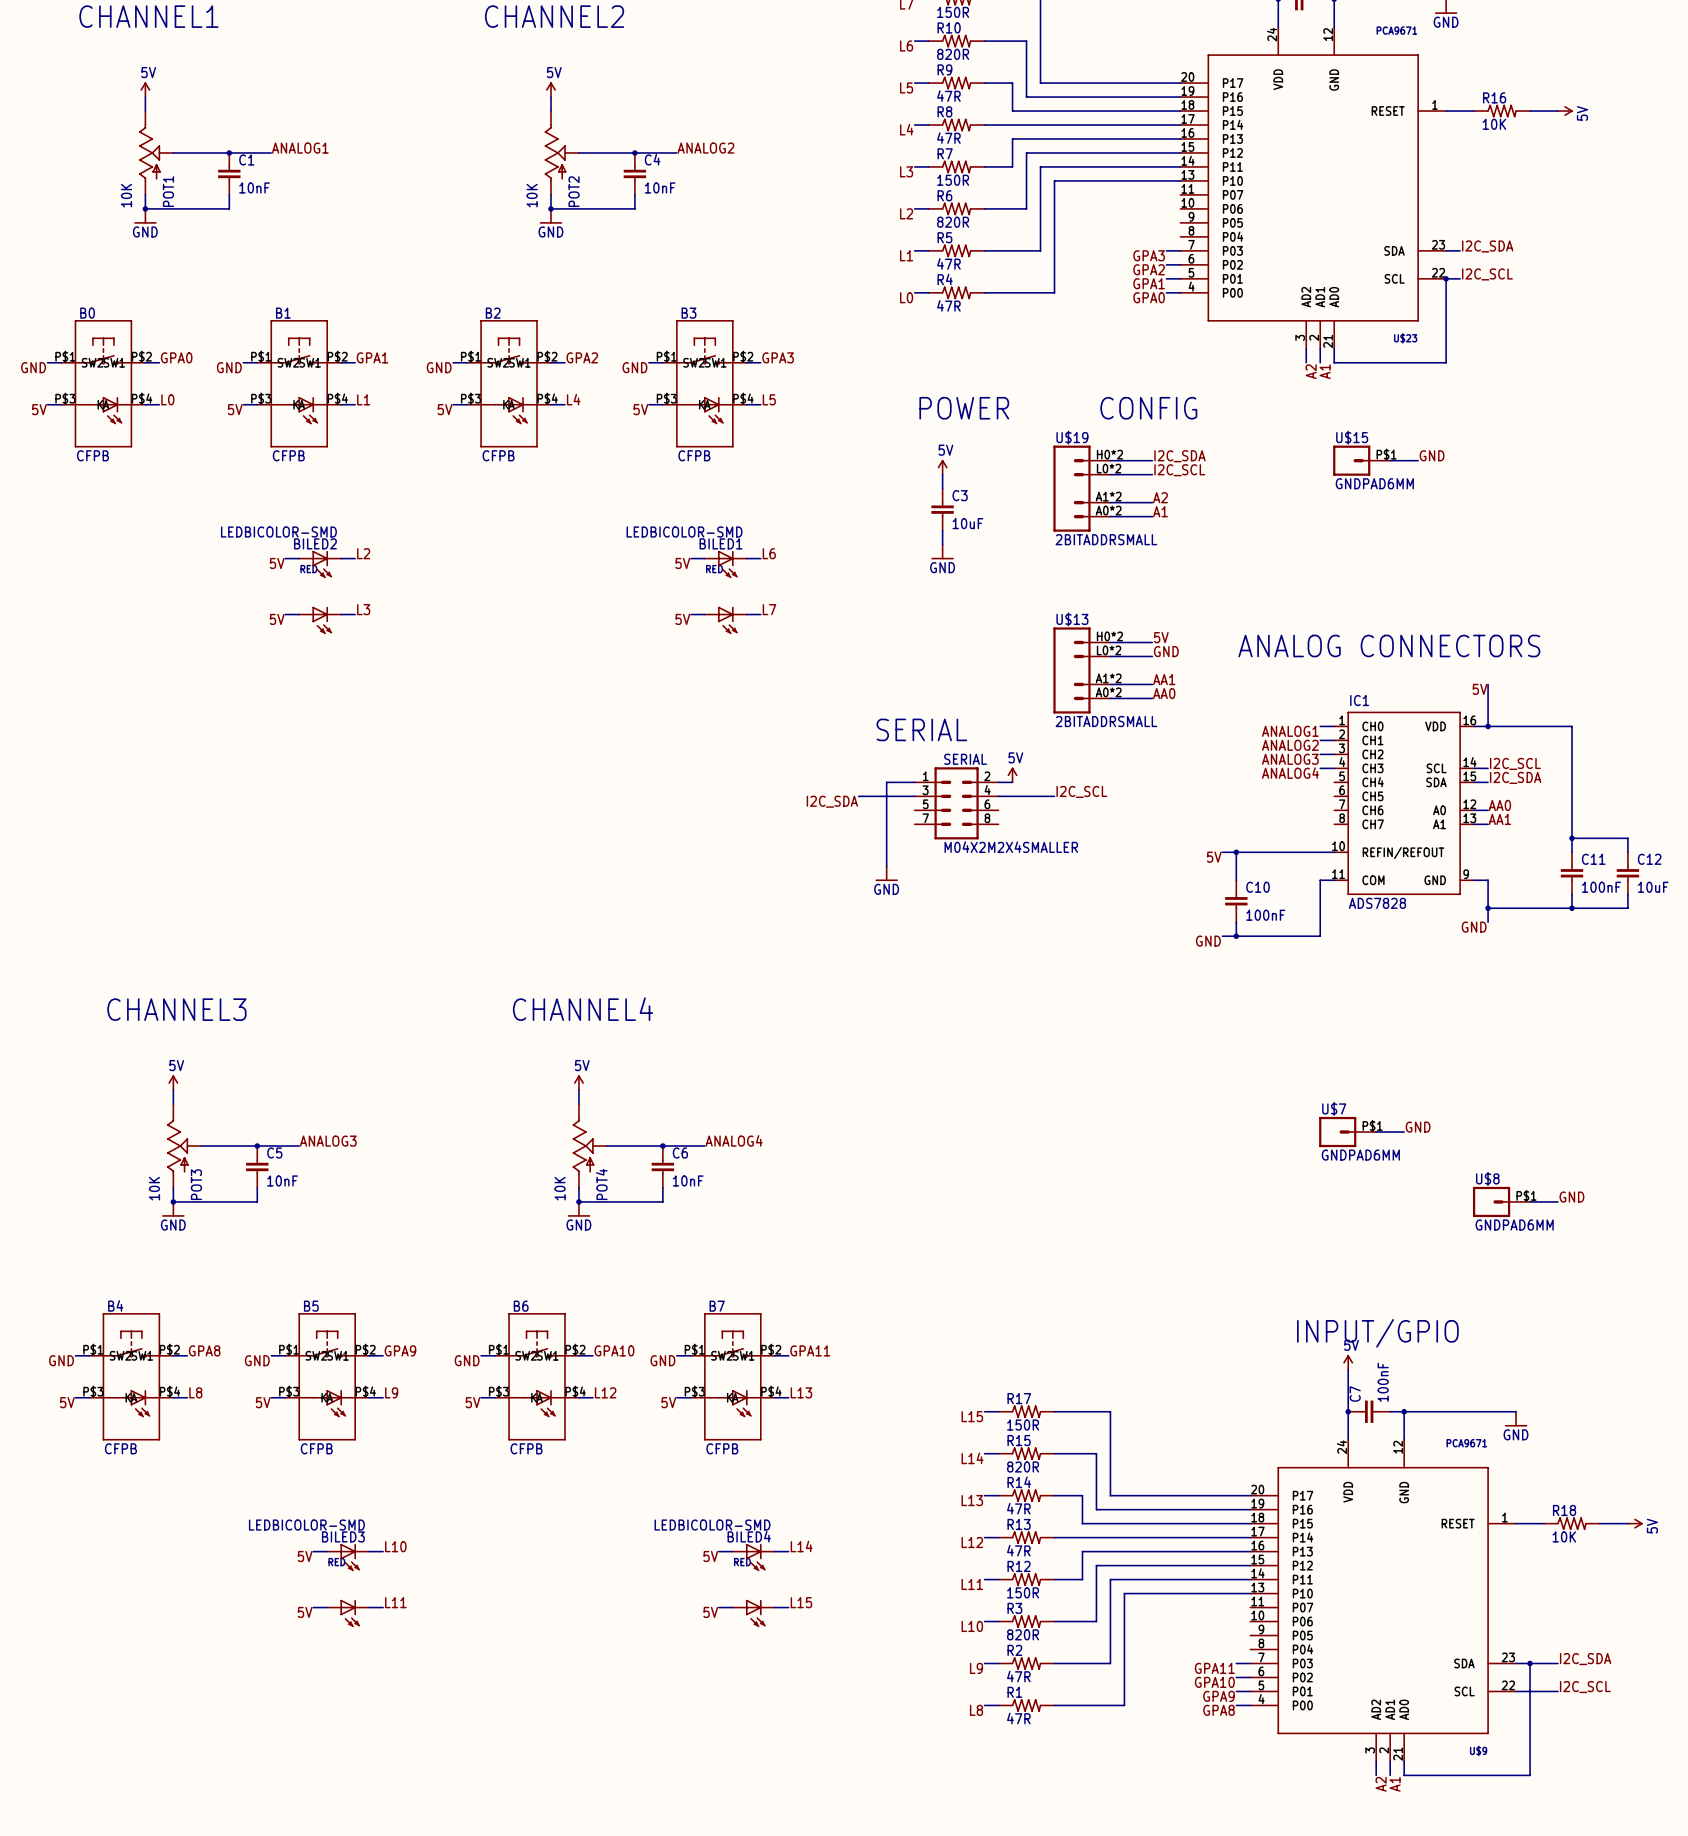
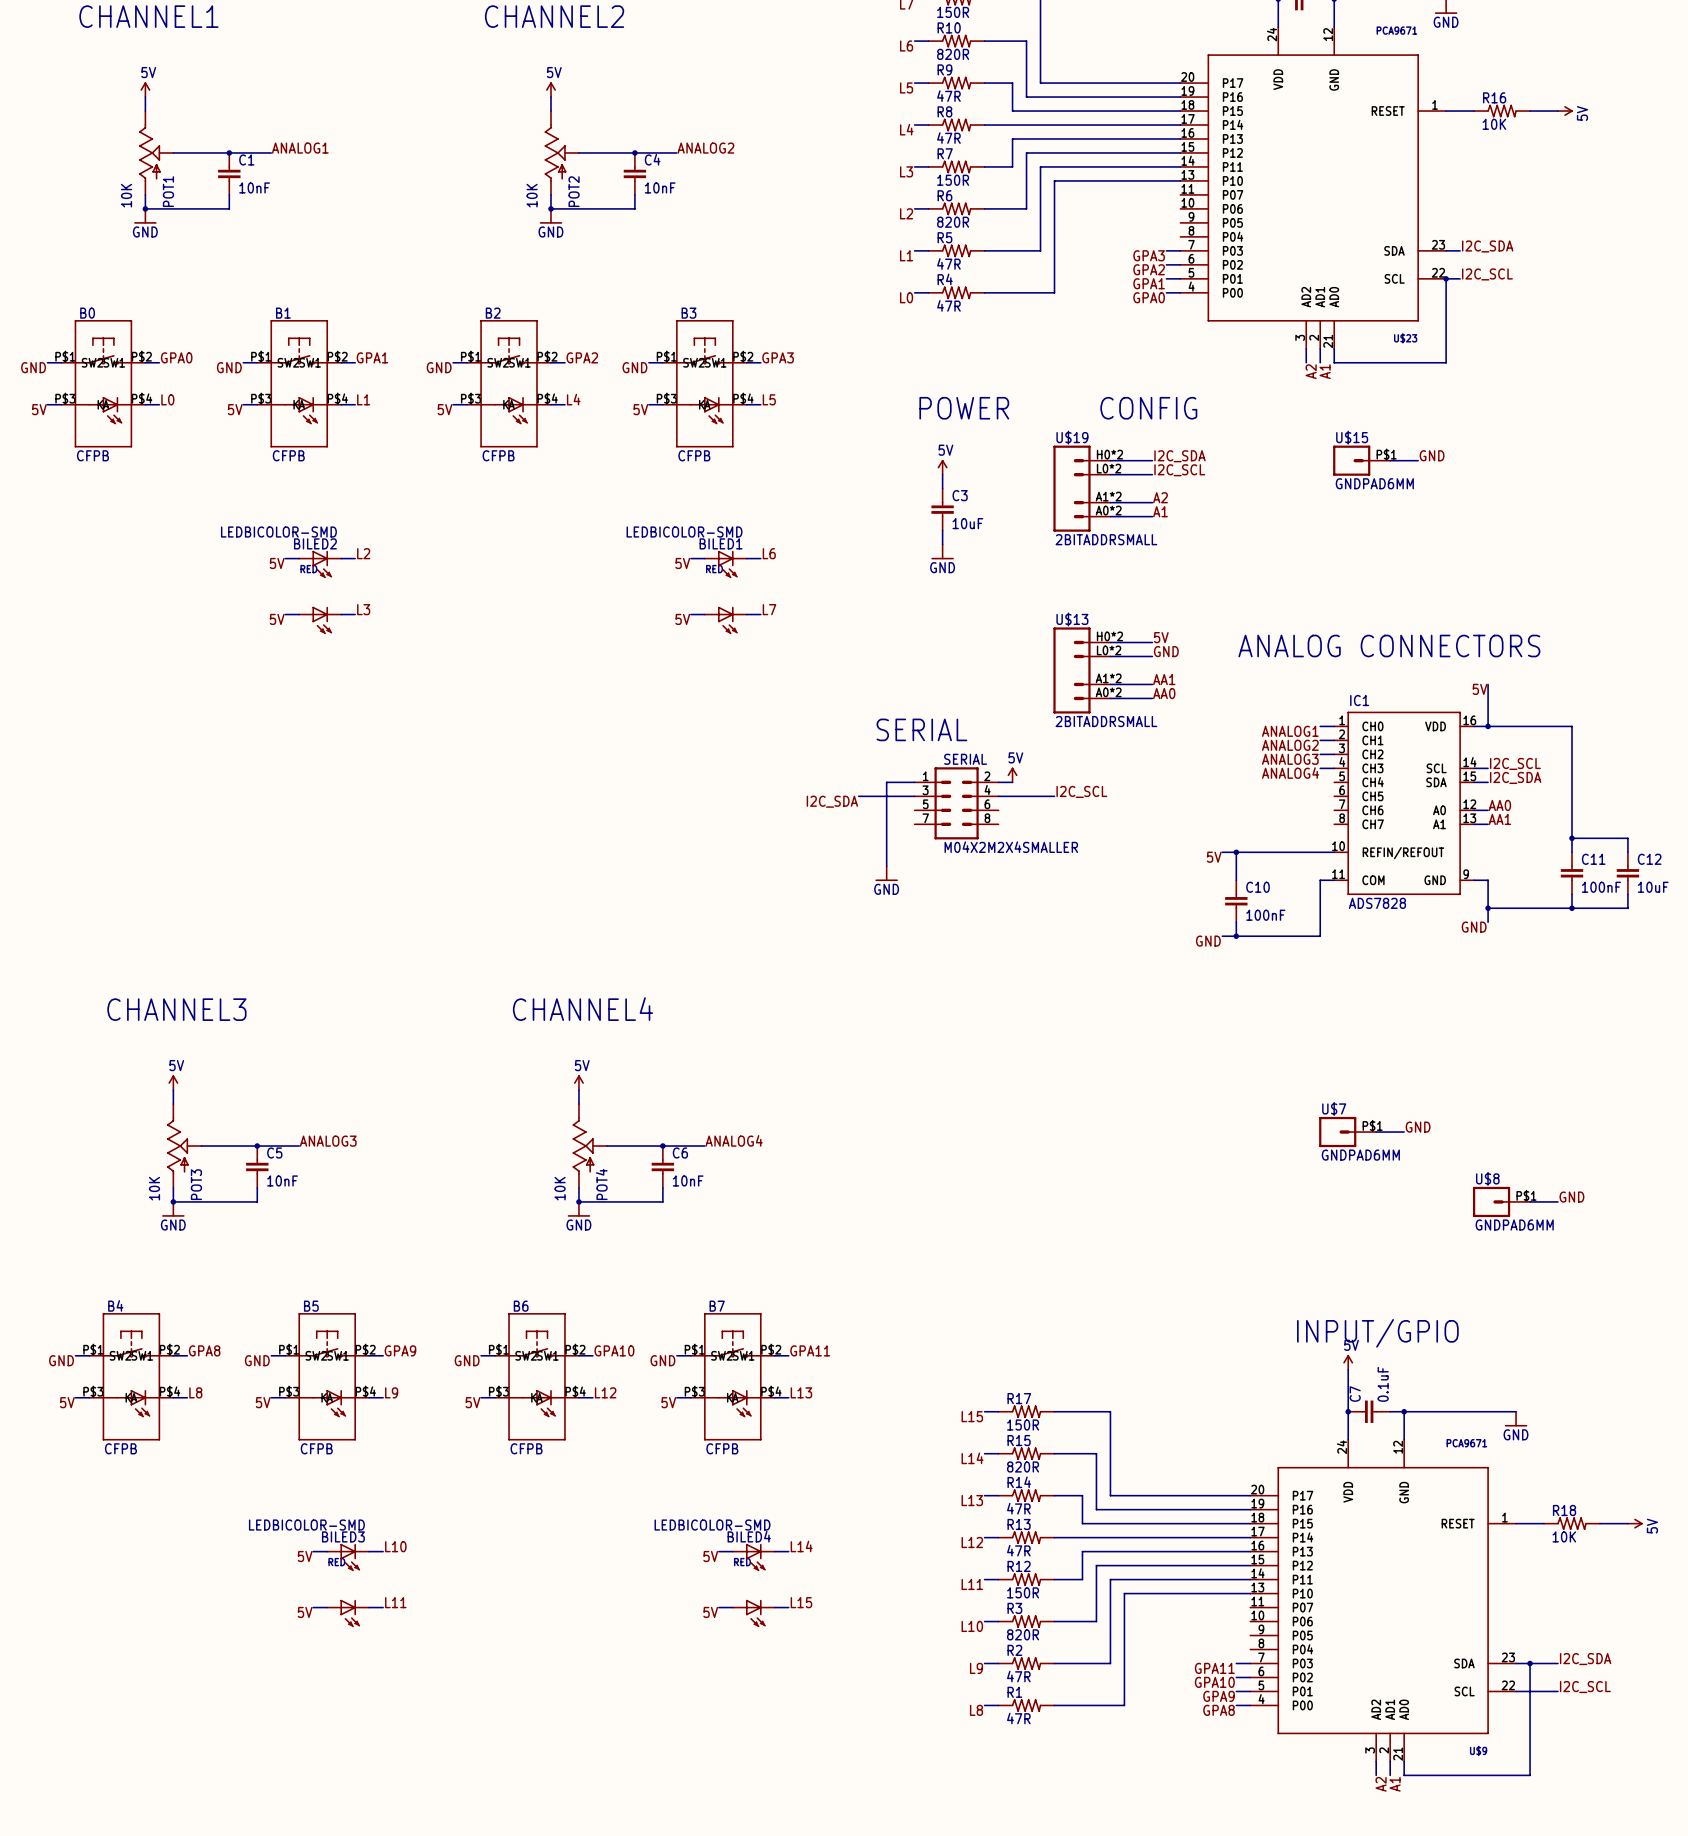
C7 value: 100nF (1383, 1382) -> 0.1uF (1383, 1384)

